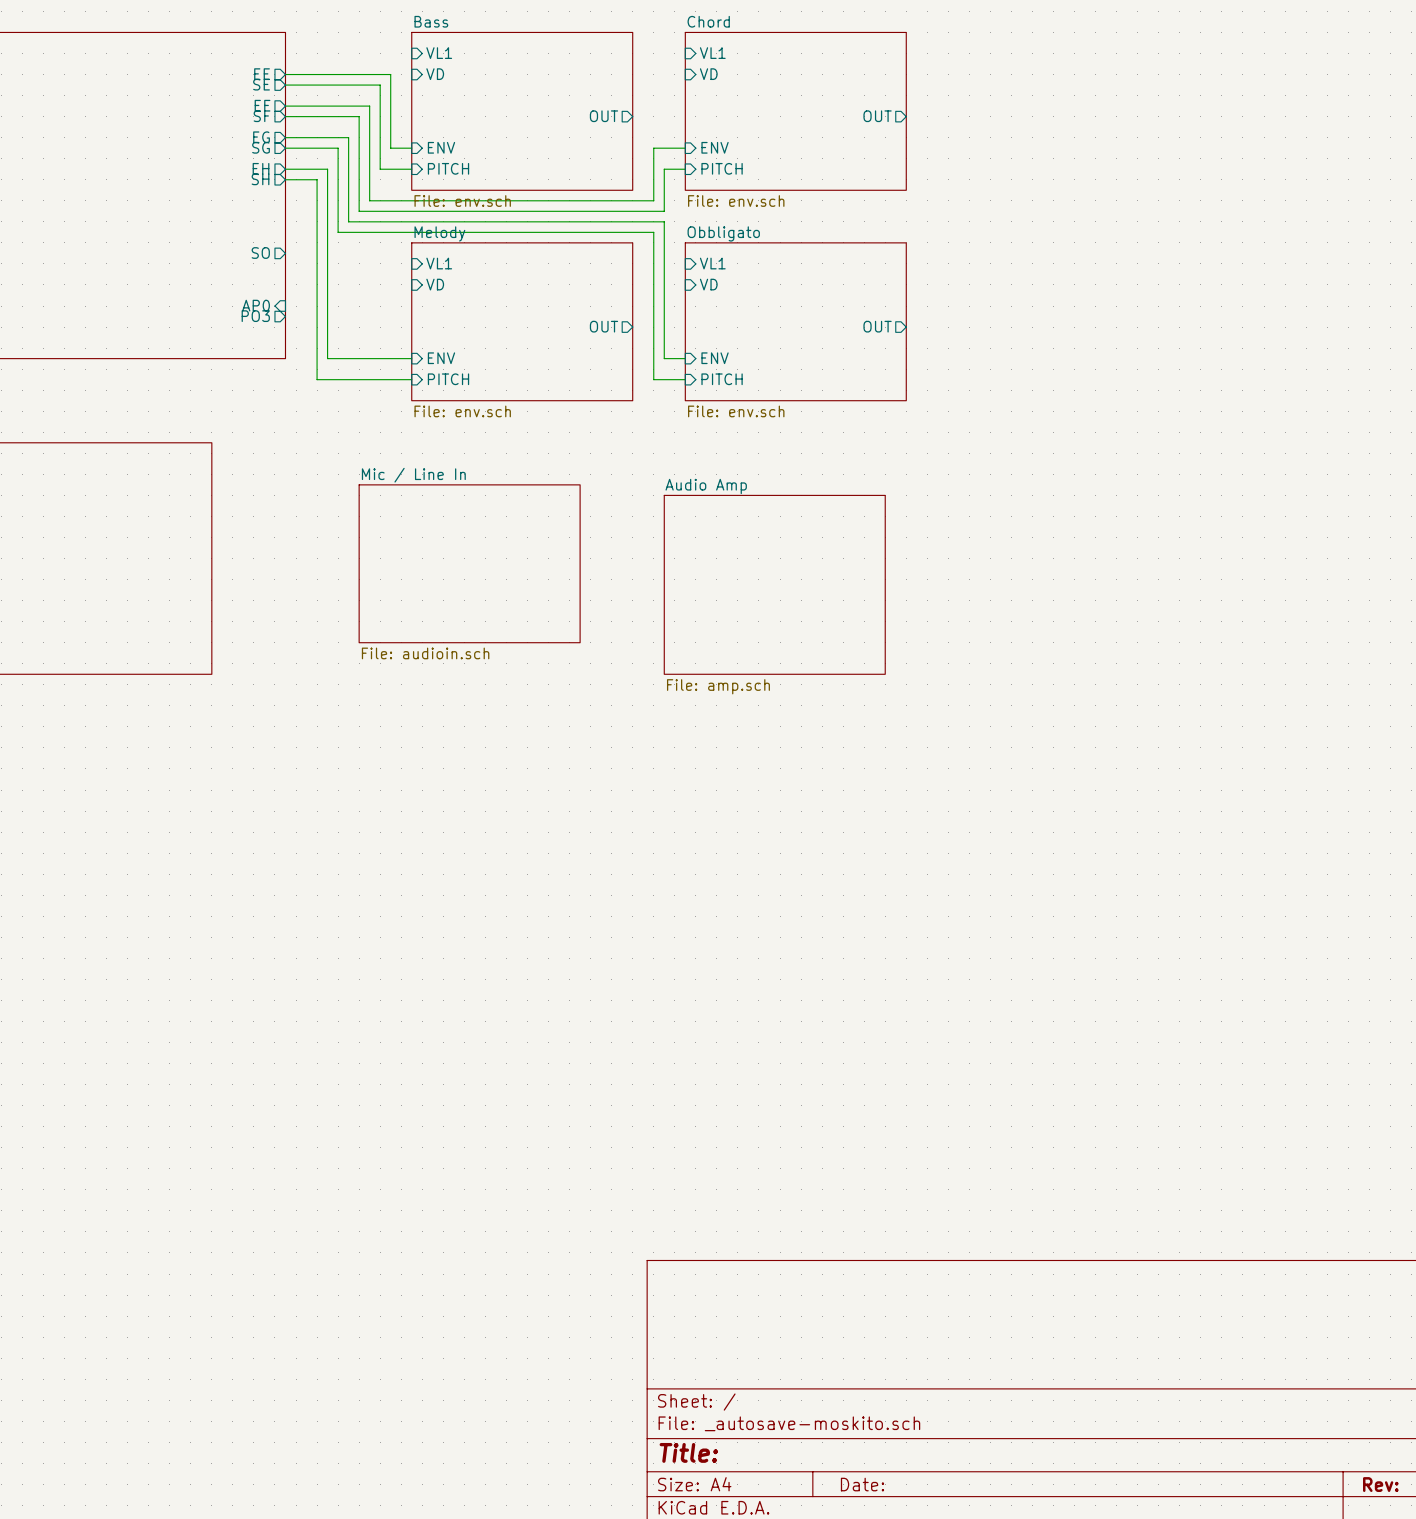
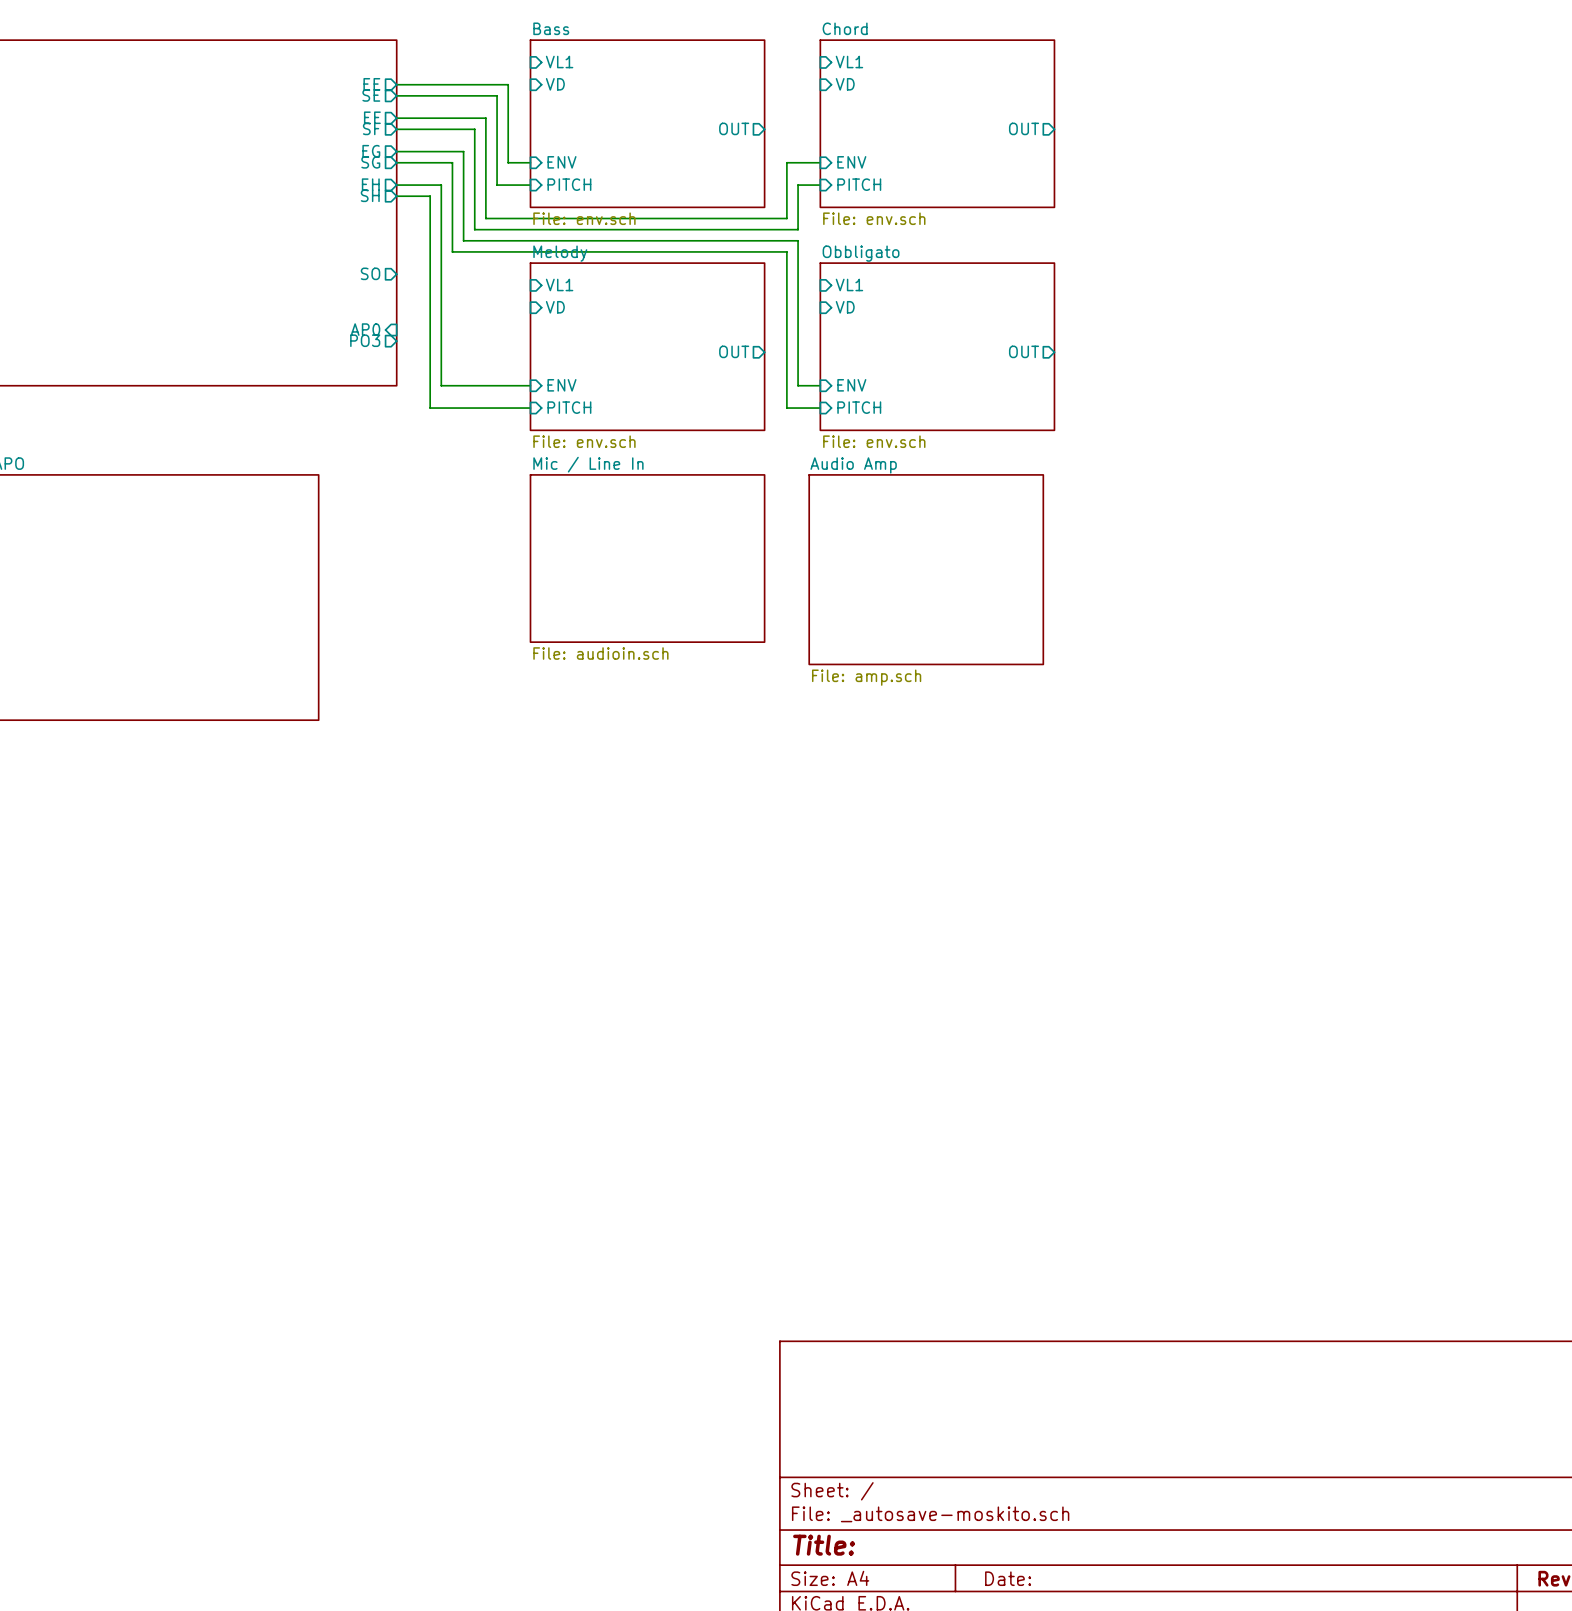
sheet Mic / Line In position: (469, 563) -> (647, 558)
sheet Audio Amp position: (774, 584) -> (926, 569)

